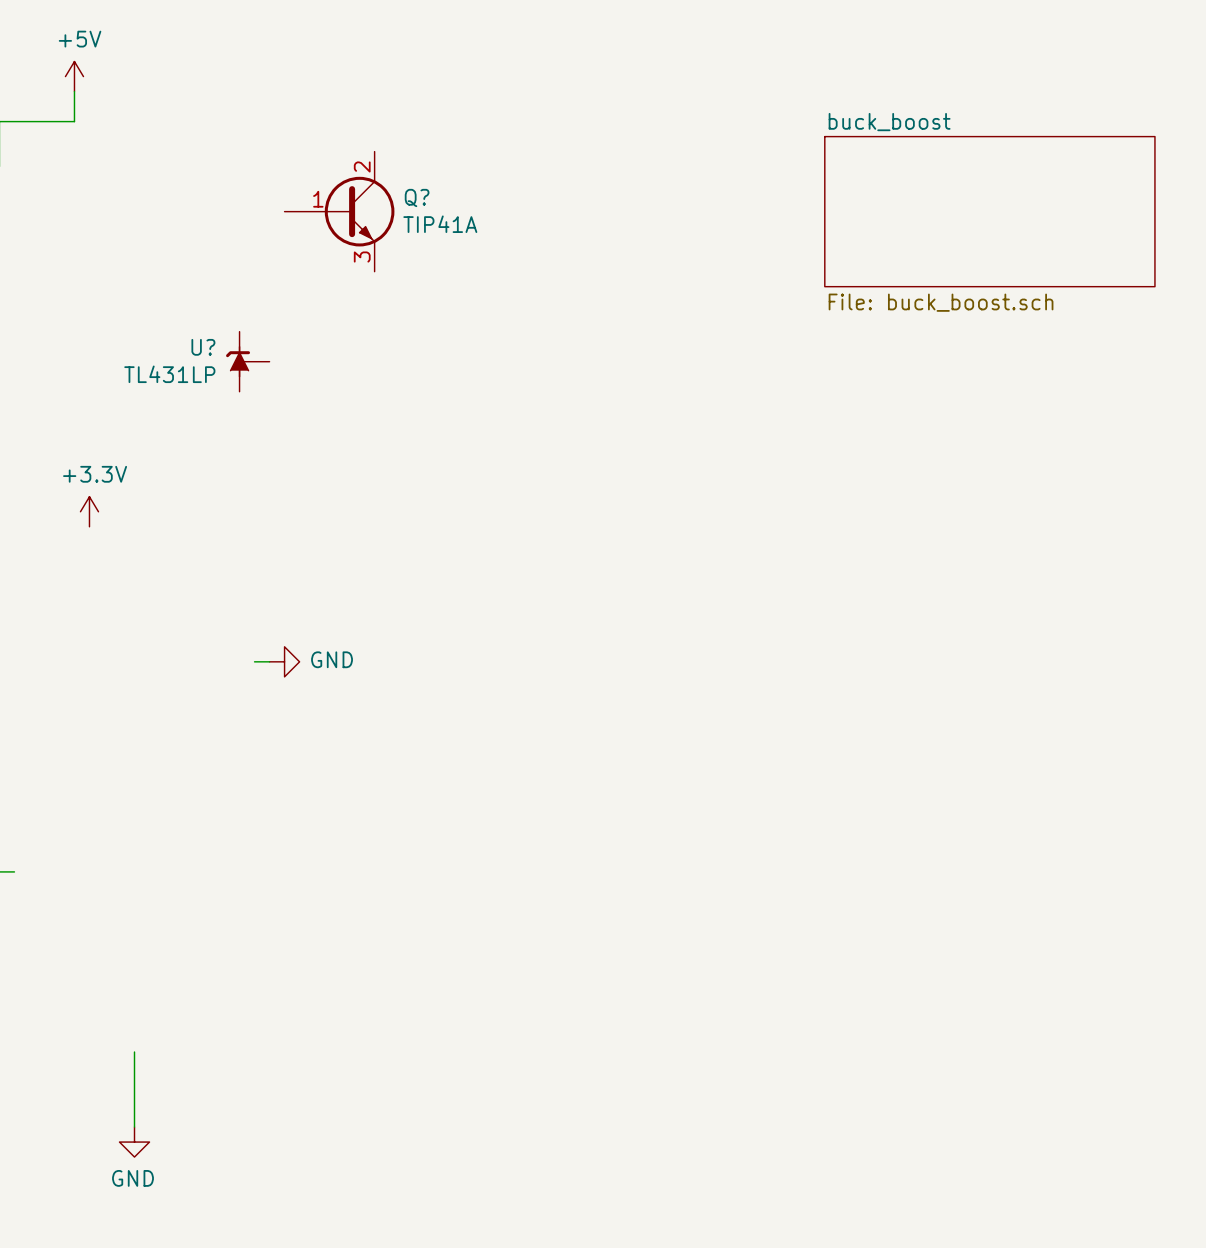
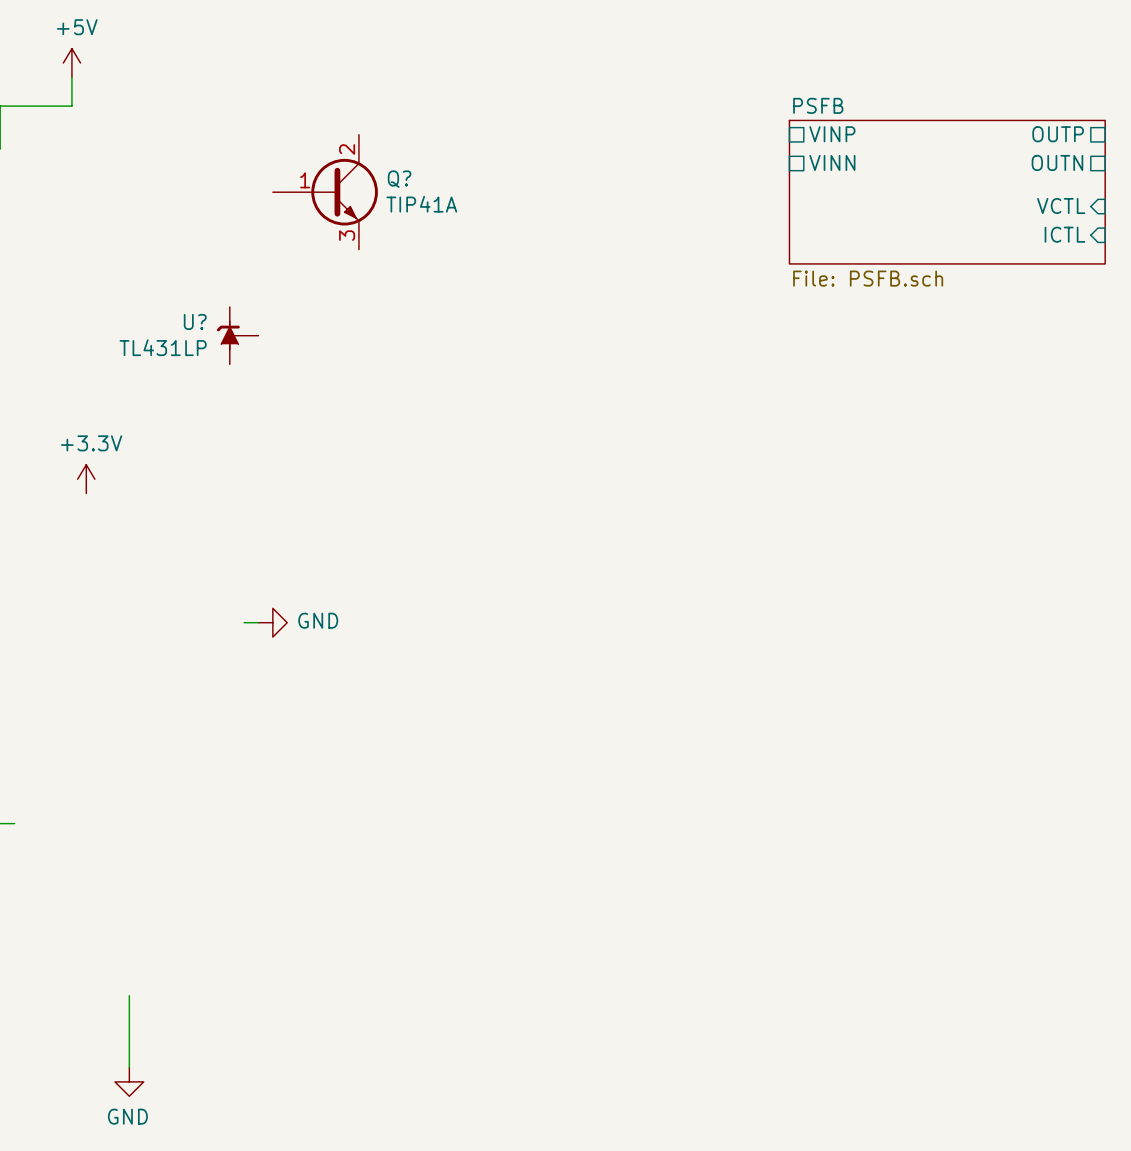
sheet buck_boost name: buck_boost (889, 122) -> PSFB (818, 105)
sheet pin: none -> VINP (832, 134)
sheet pin: none -> OUTP (1058, 134)
sheet pin: none -> VINN (832, 162)
sheet pin: none -> OUTN (1057, 162)
sheet pin: none -> VCTL (1061, 206)
sheet pin: none -> ICTL (1064, 234)
sheet buck_boost value: File: buck_boost.sch (941, 302) -> File: PSFB.sch (868, 278)

